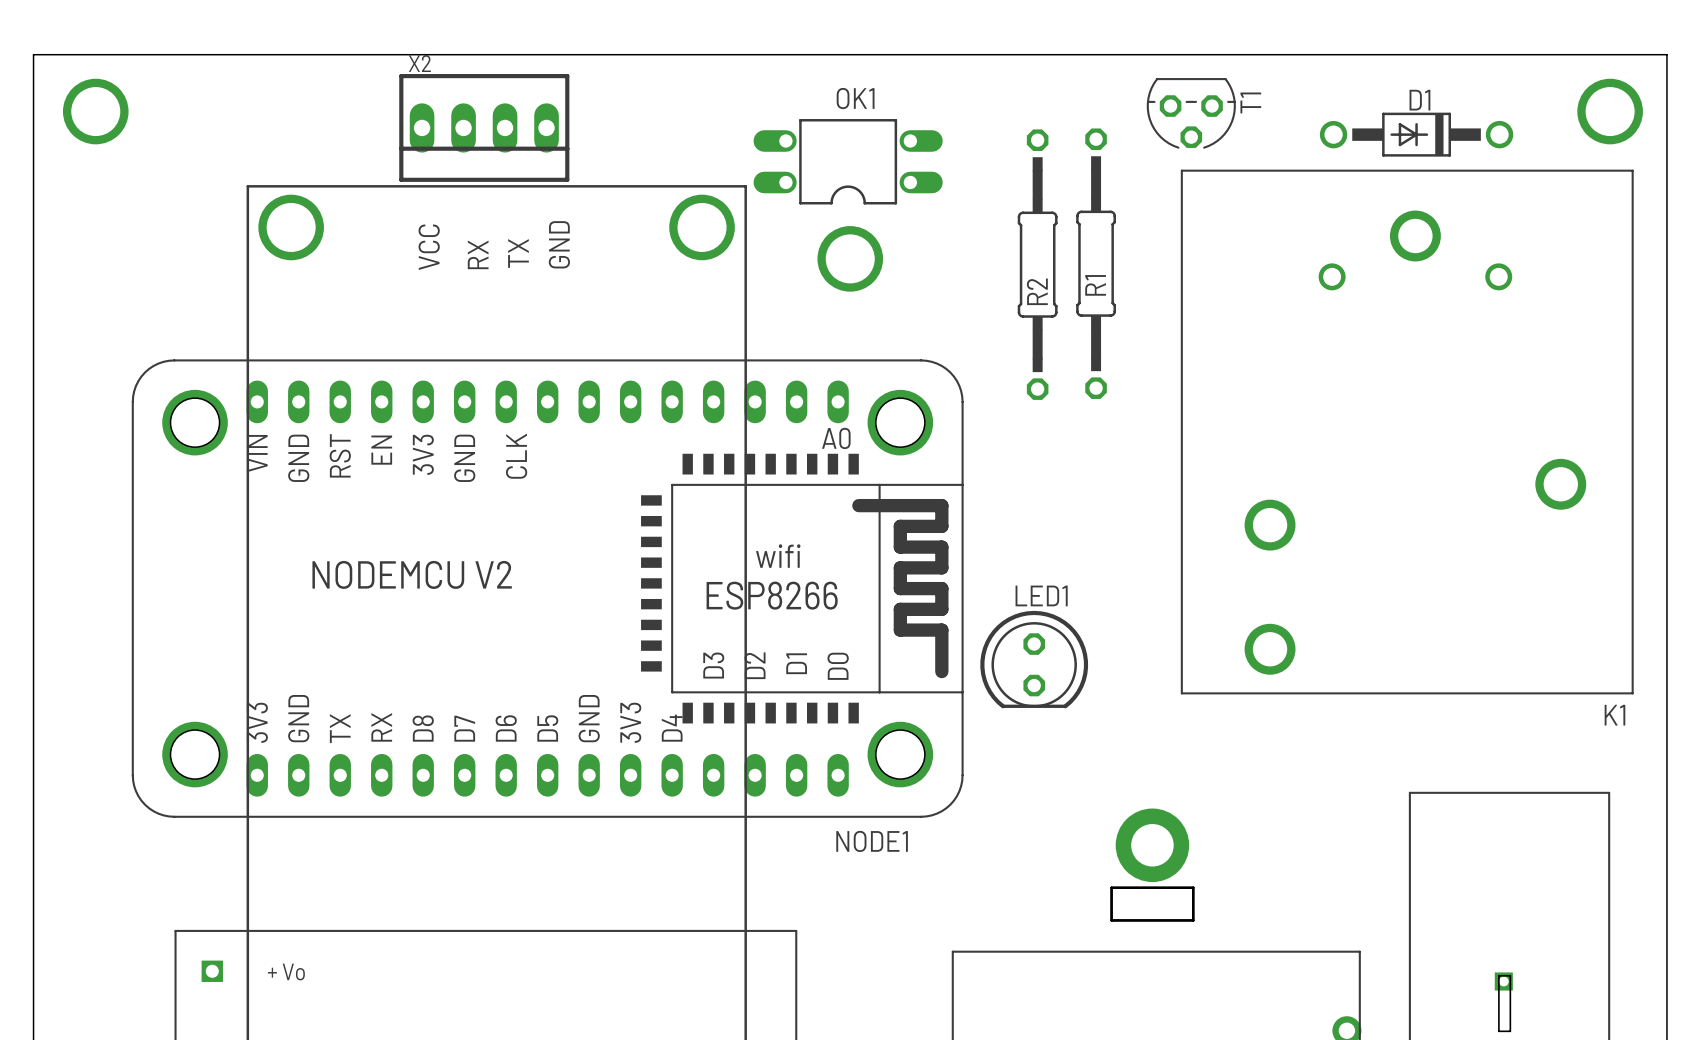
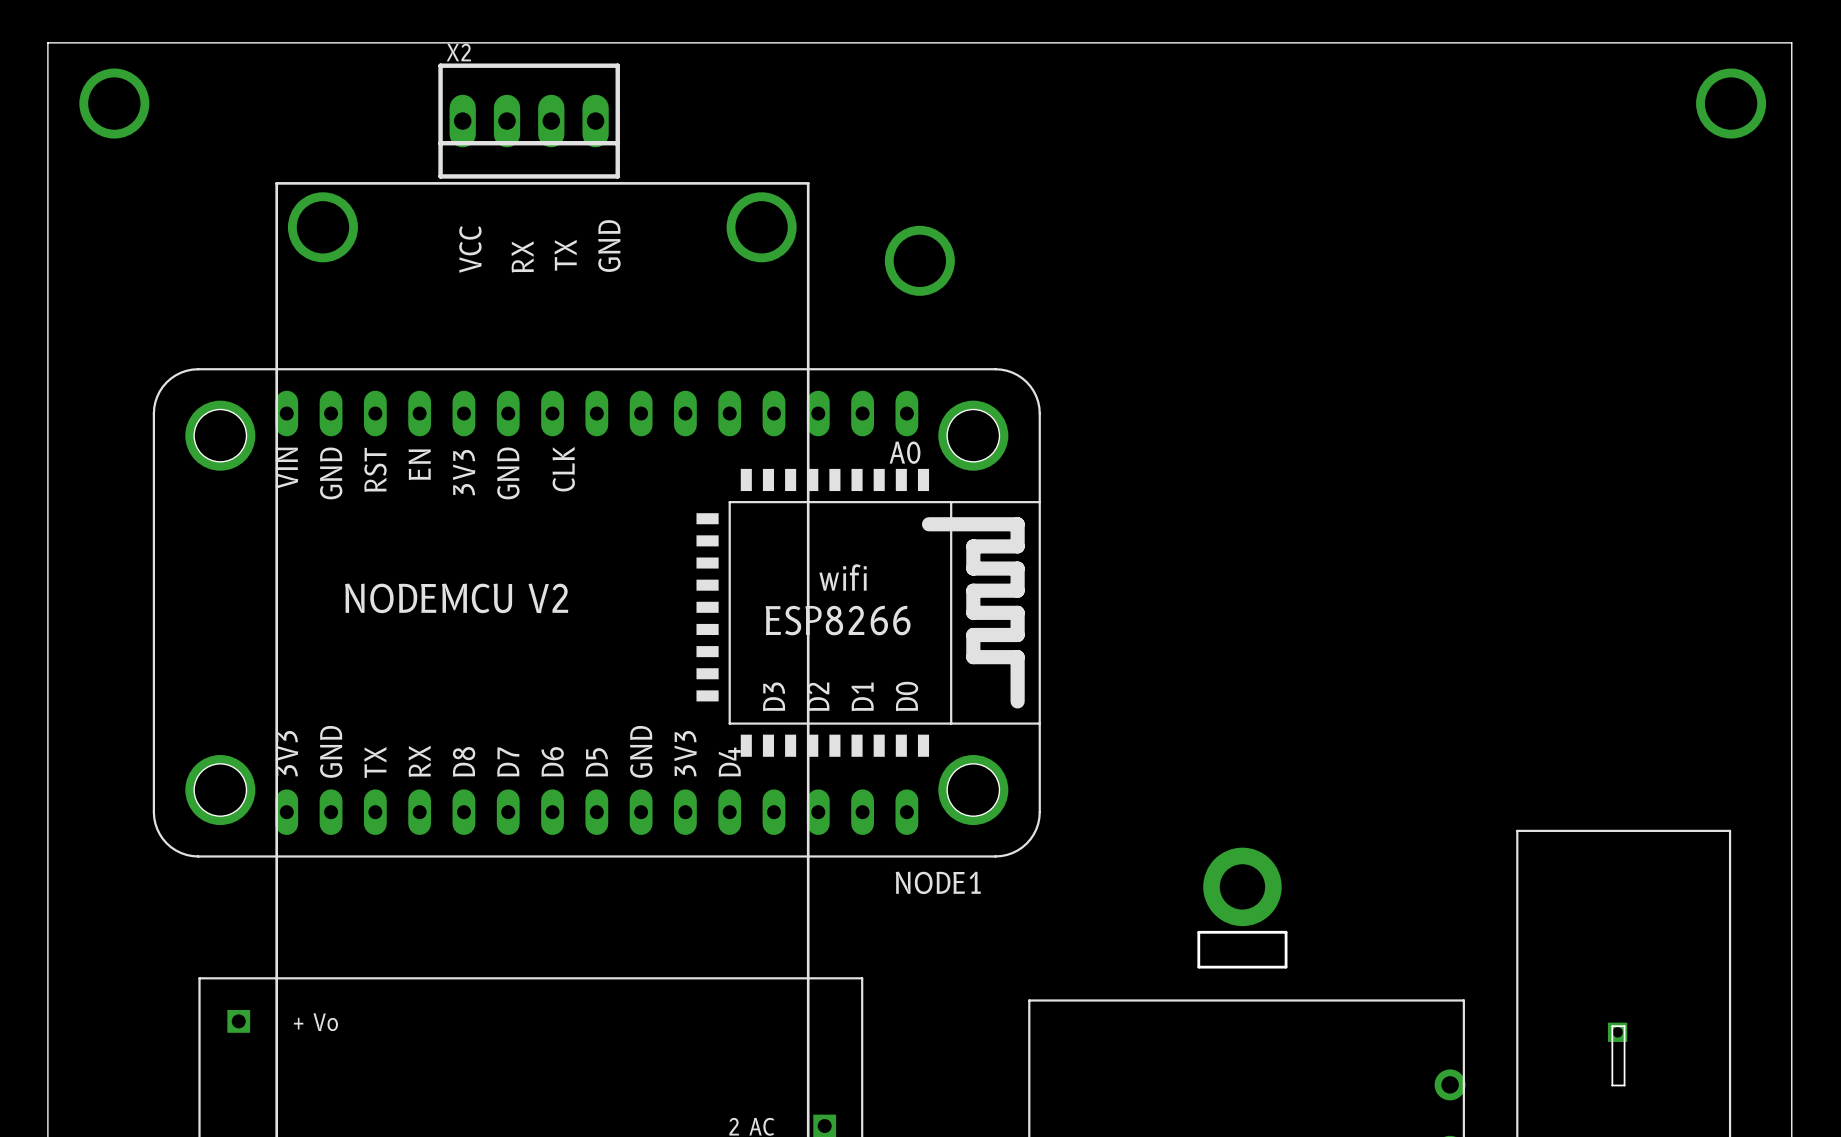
T1: (1191, 113) -> none
D1: (1416, 134) -> none
OK1: (848, 161) -> none
R1: (1096, 263) -> none
R2: (1037, 264) -> none
K1: (1407, 432) -> none
LED1: (1034, 659) -> none

